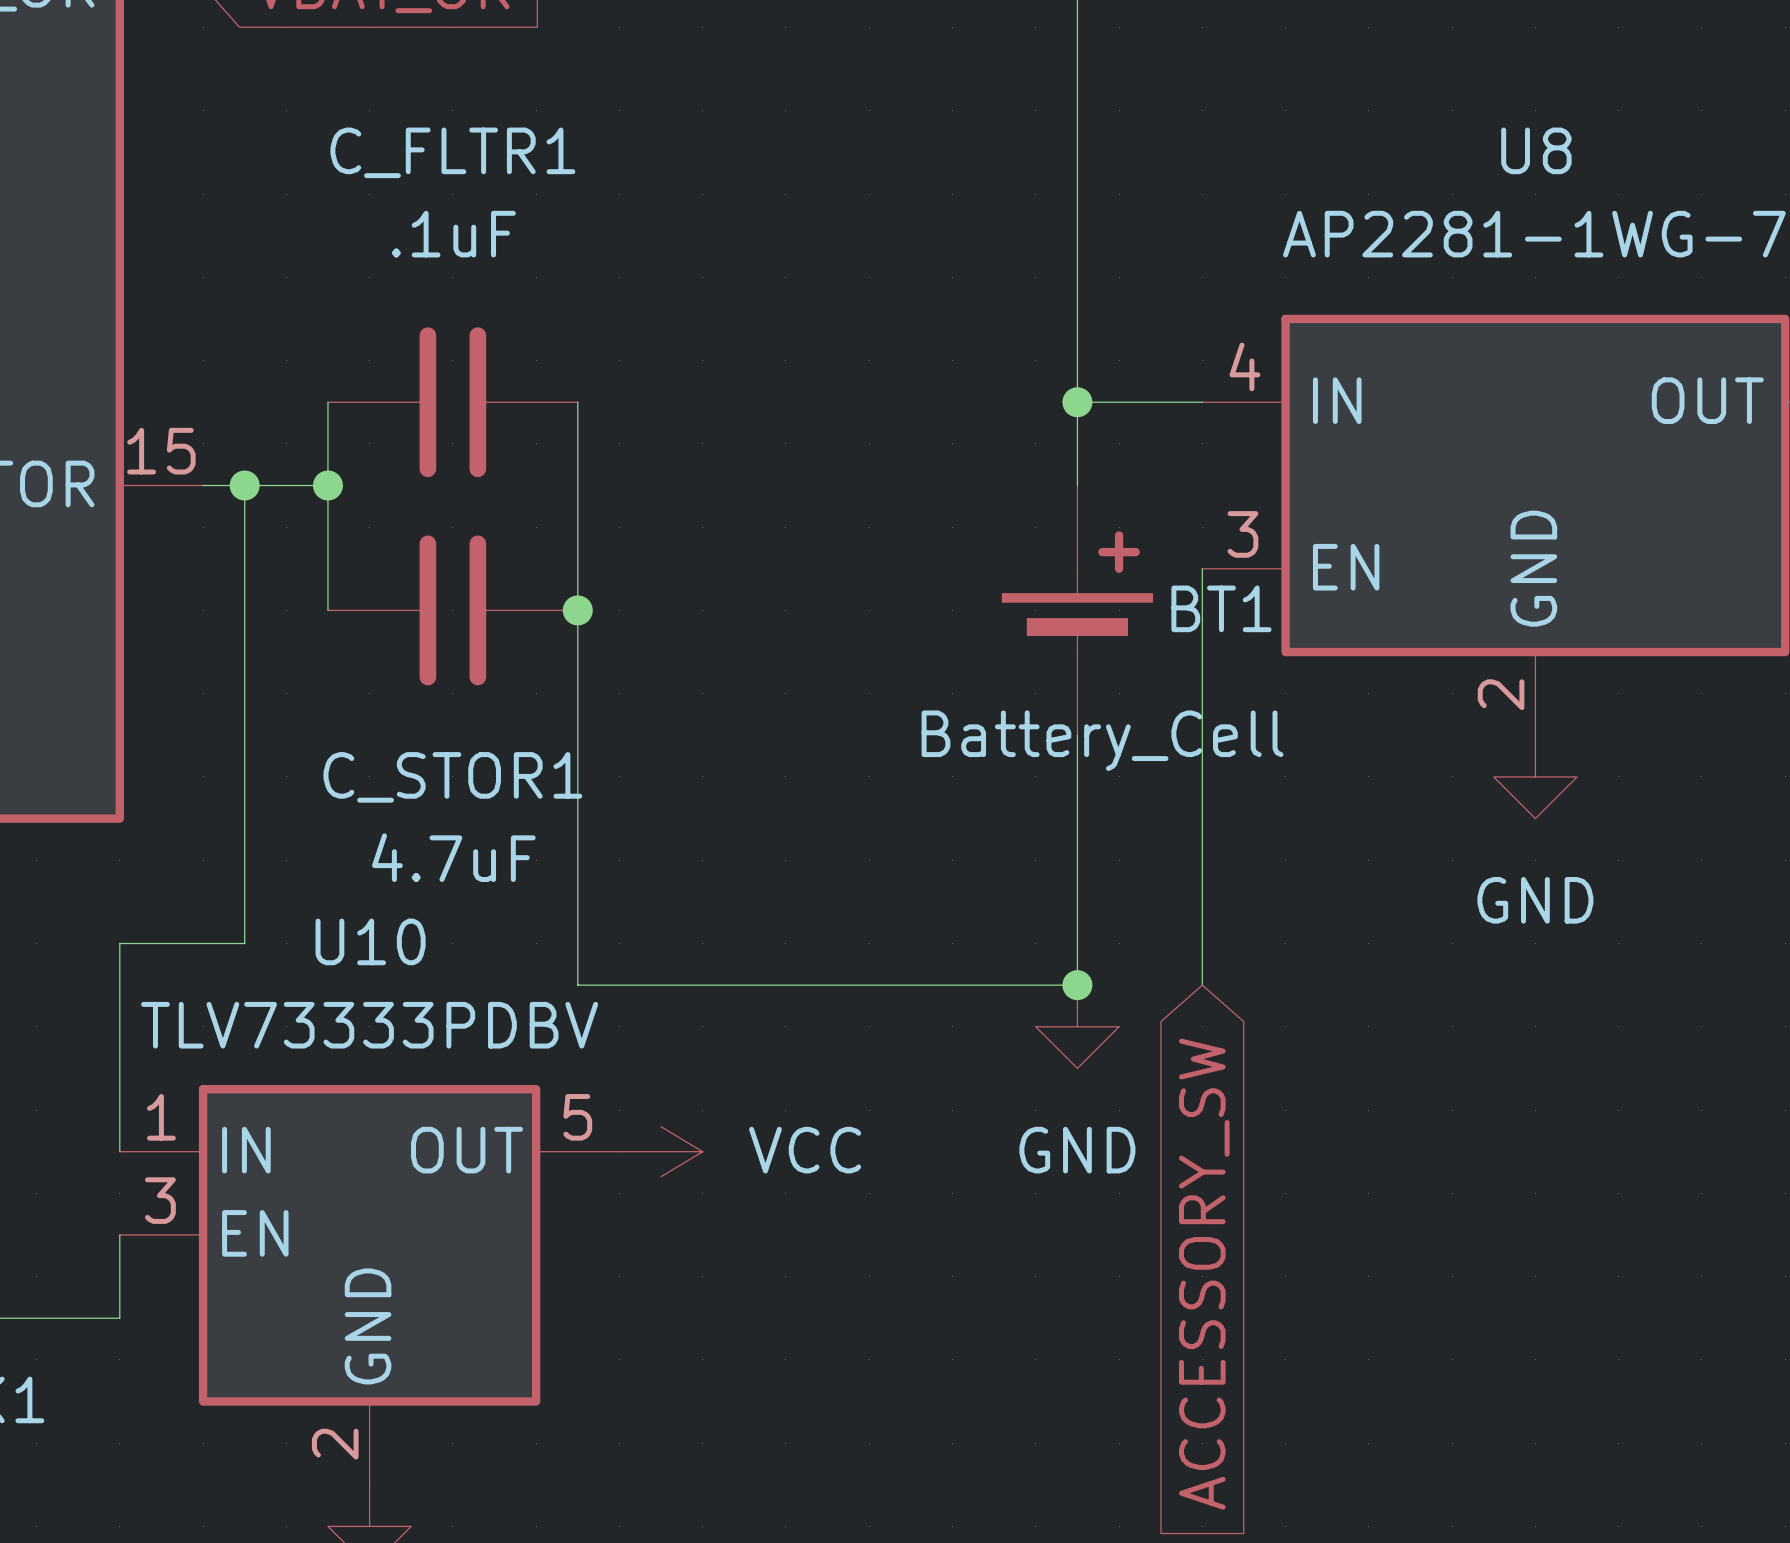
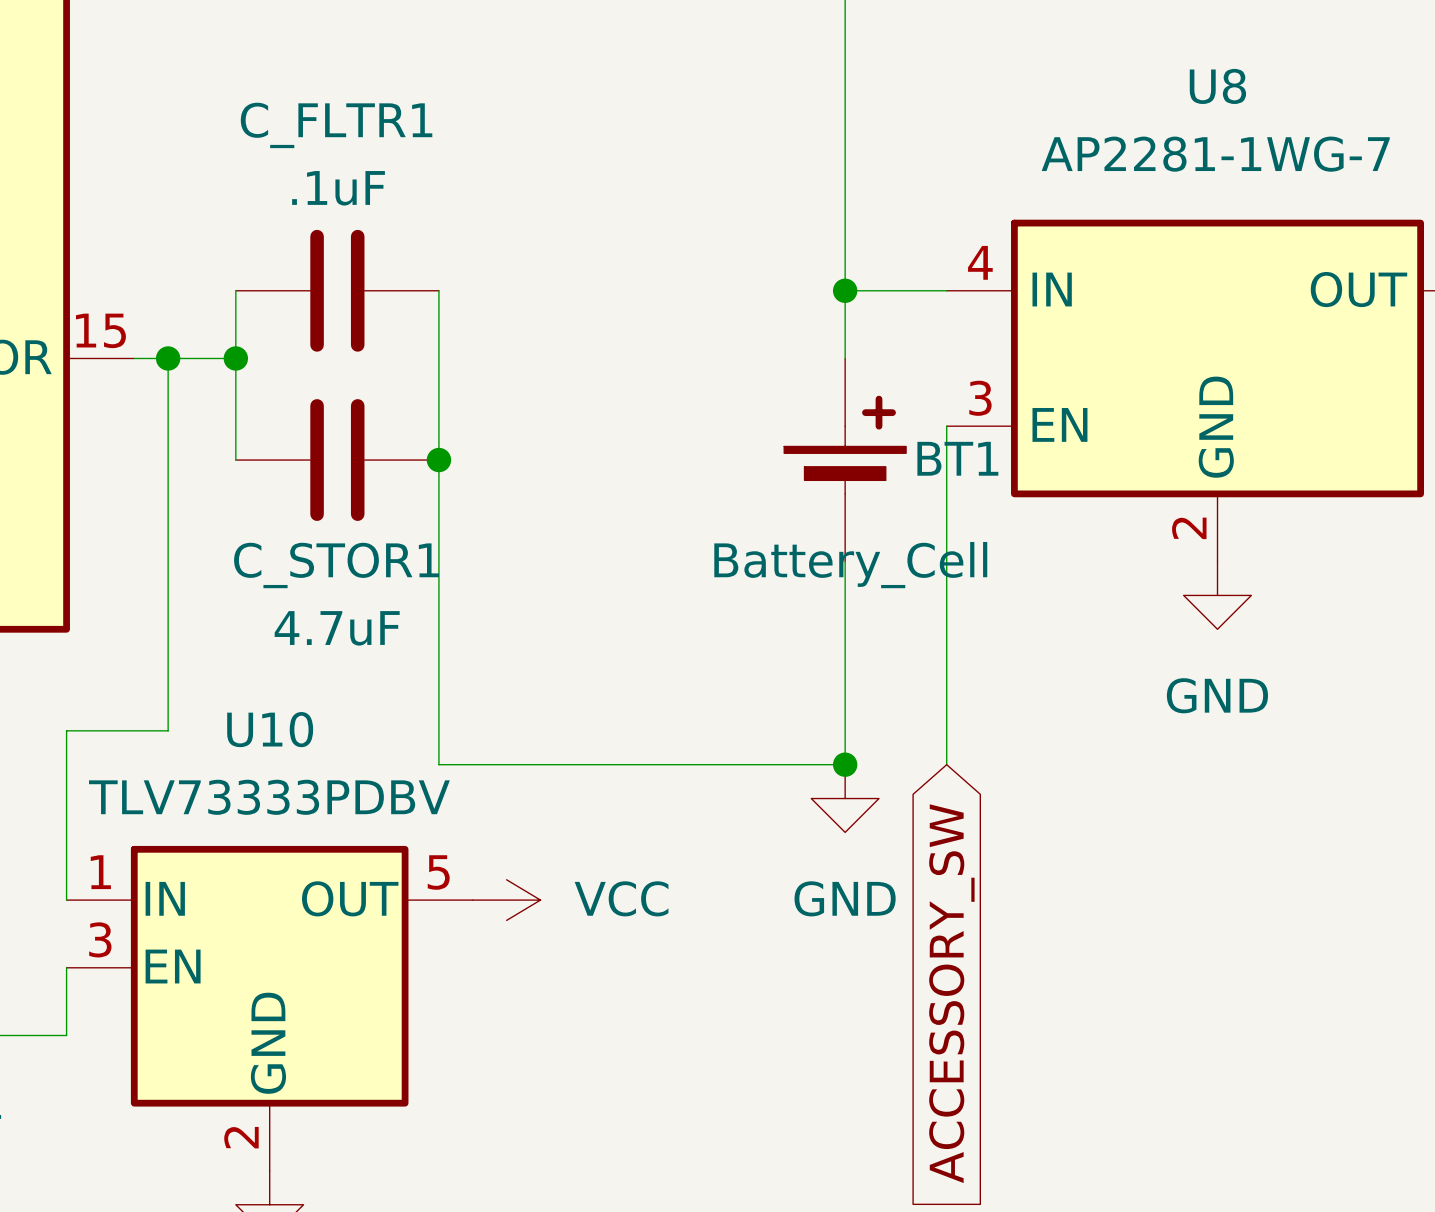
C_FLTR1 name position: C_FLTR1 (452, 152) -> C_FLTR1 (336, 125)
C_FLTR1 value position: .1uF (453, 234) -> .1uF (338, 188)
C_STOR1 name position: C_STOR1 (452, 777) -> C_STOR1 (336, 565)
C_STOR1 value position: 4.7uF (453, 857) -> 4.7uF (337, 628)

